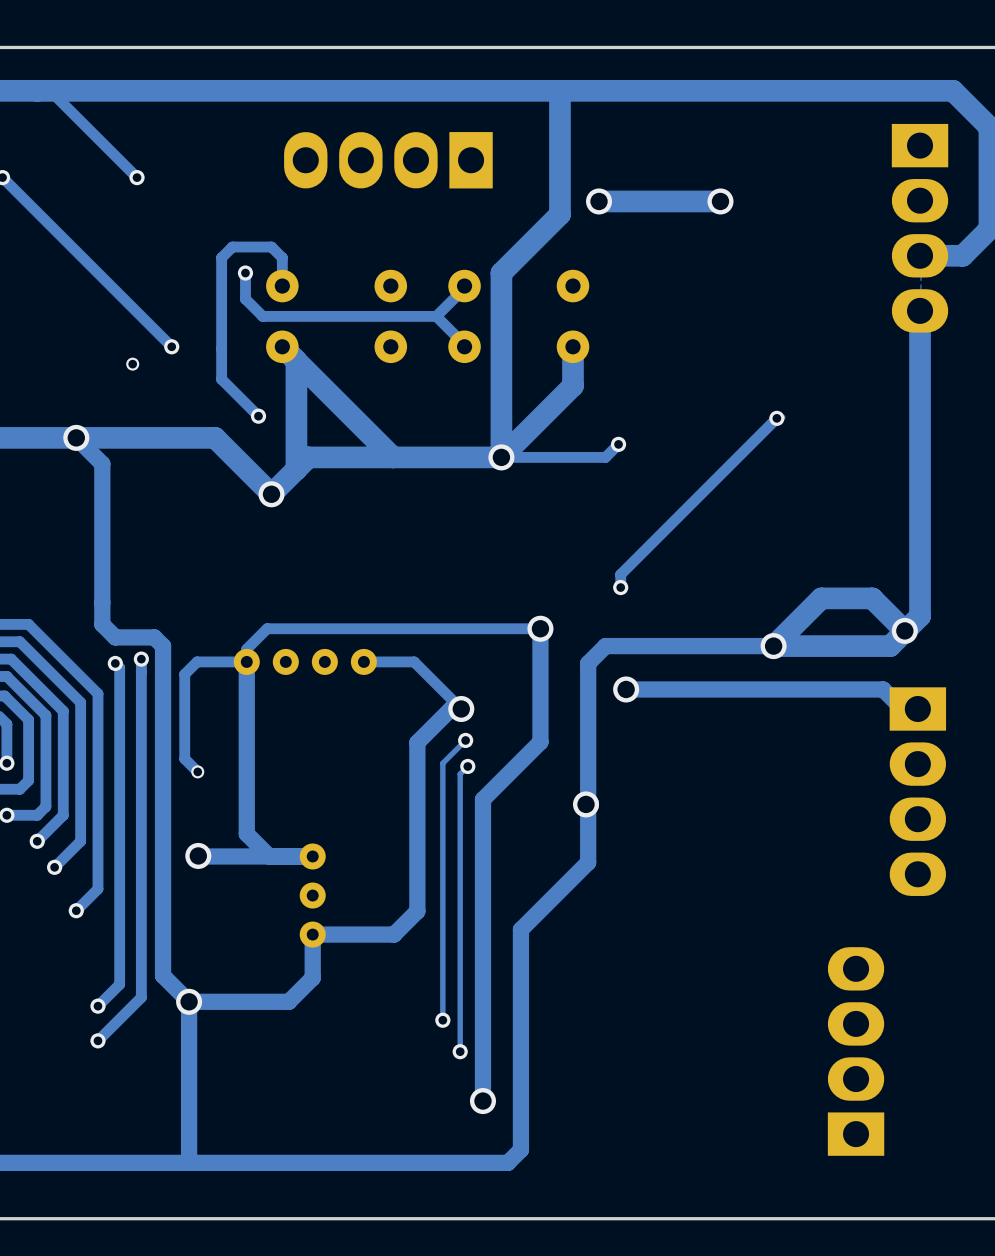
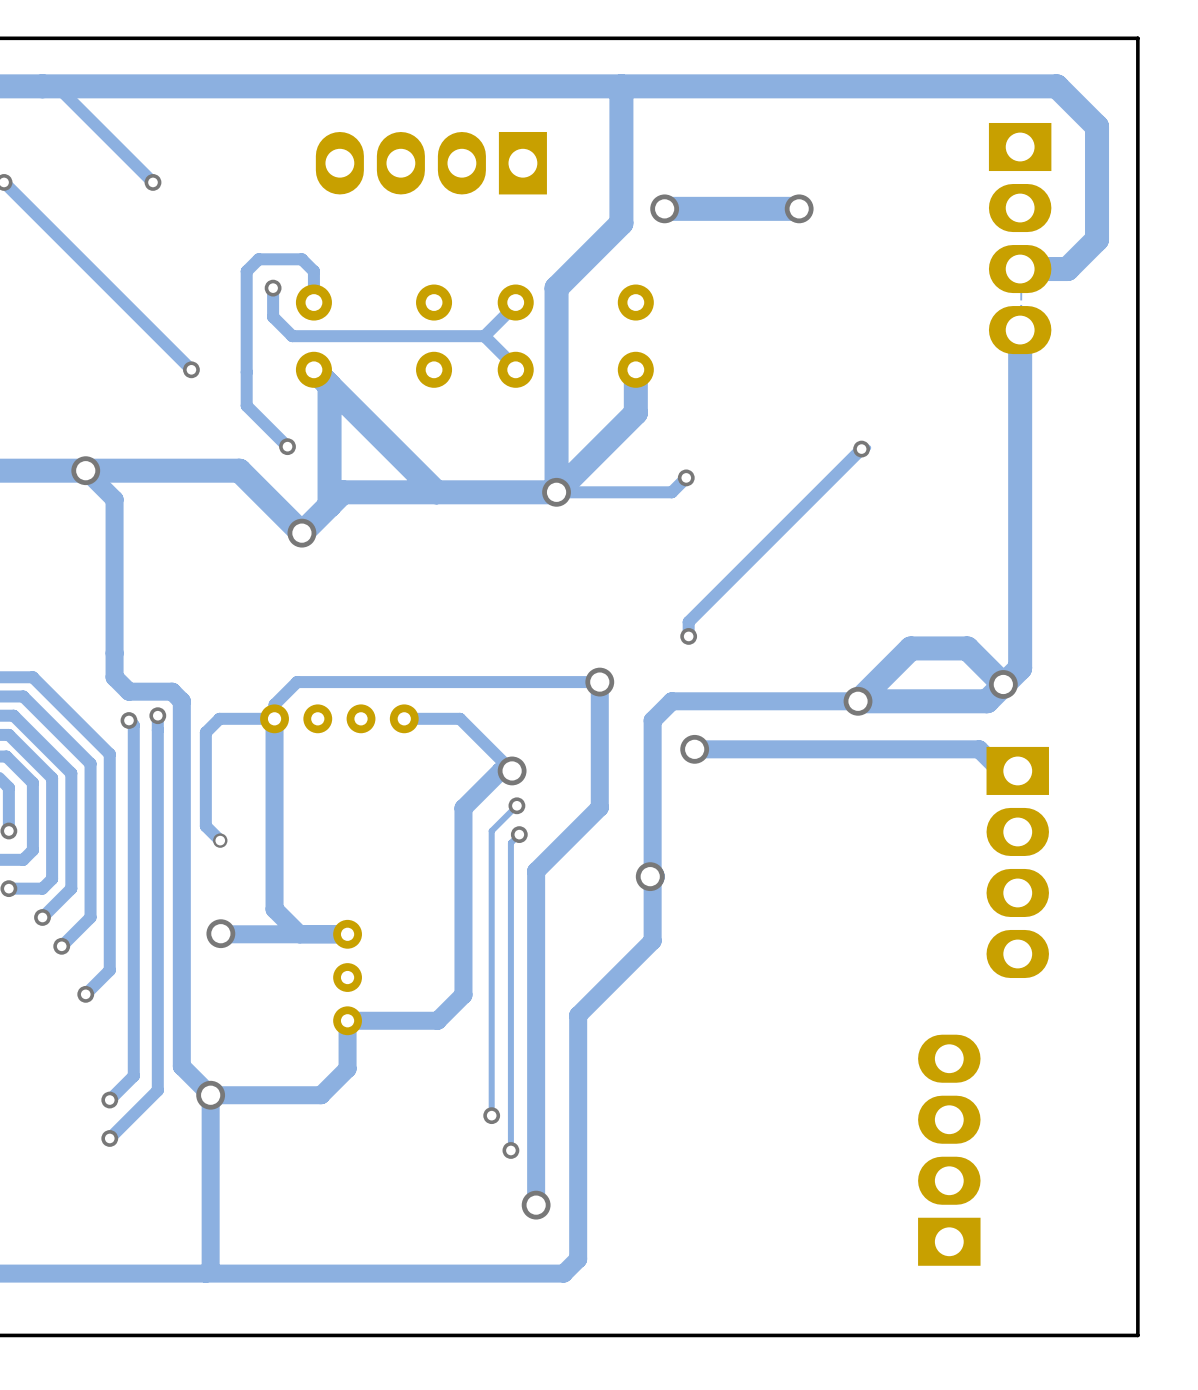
via: (132, 364) -> none

